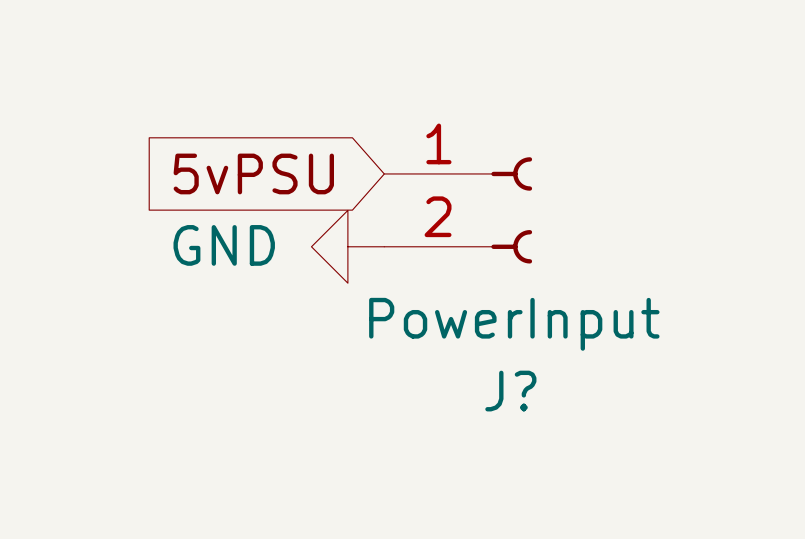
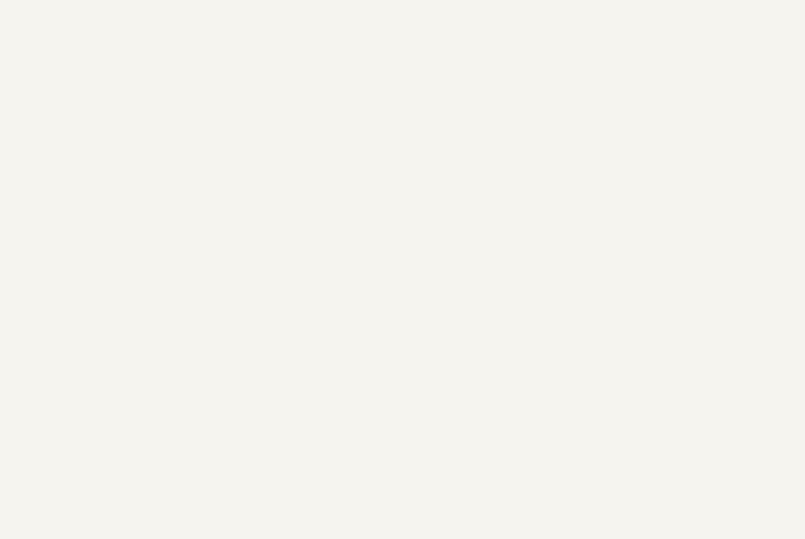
global label: 5vPSU (253, 173) -> none
J?: PowerInput (458, 210) -> none
power symbol: GND (347, 246) -> none

